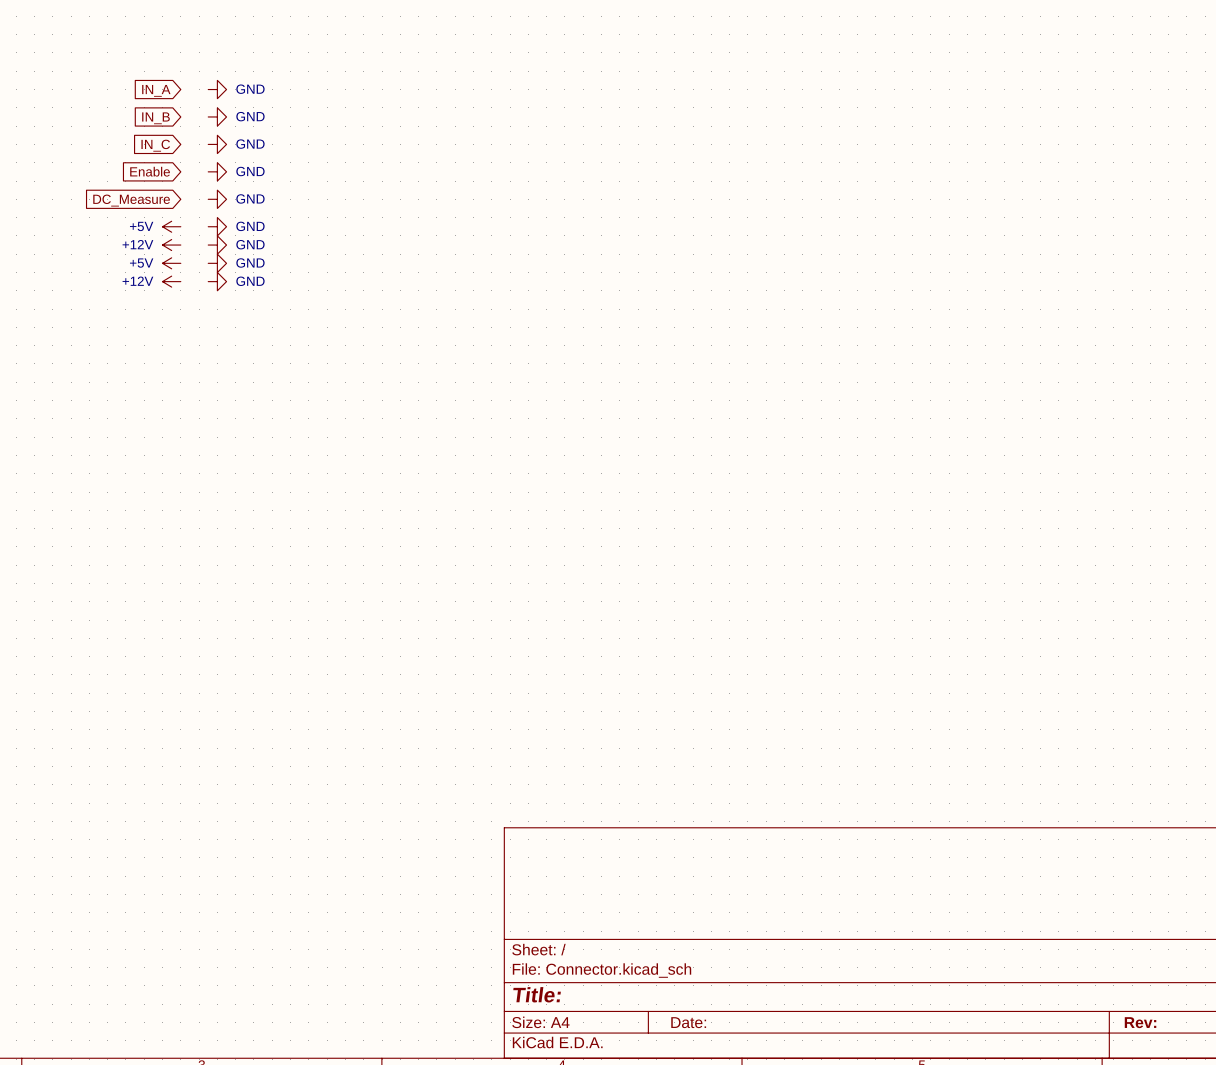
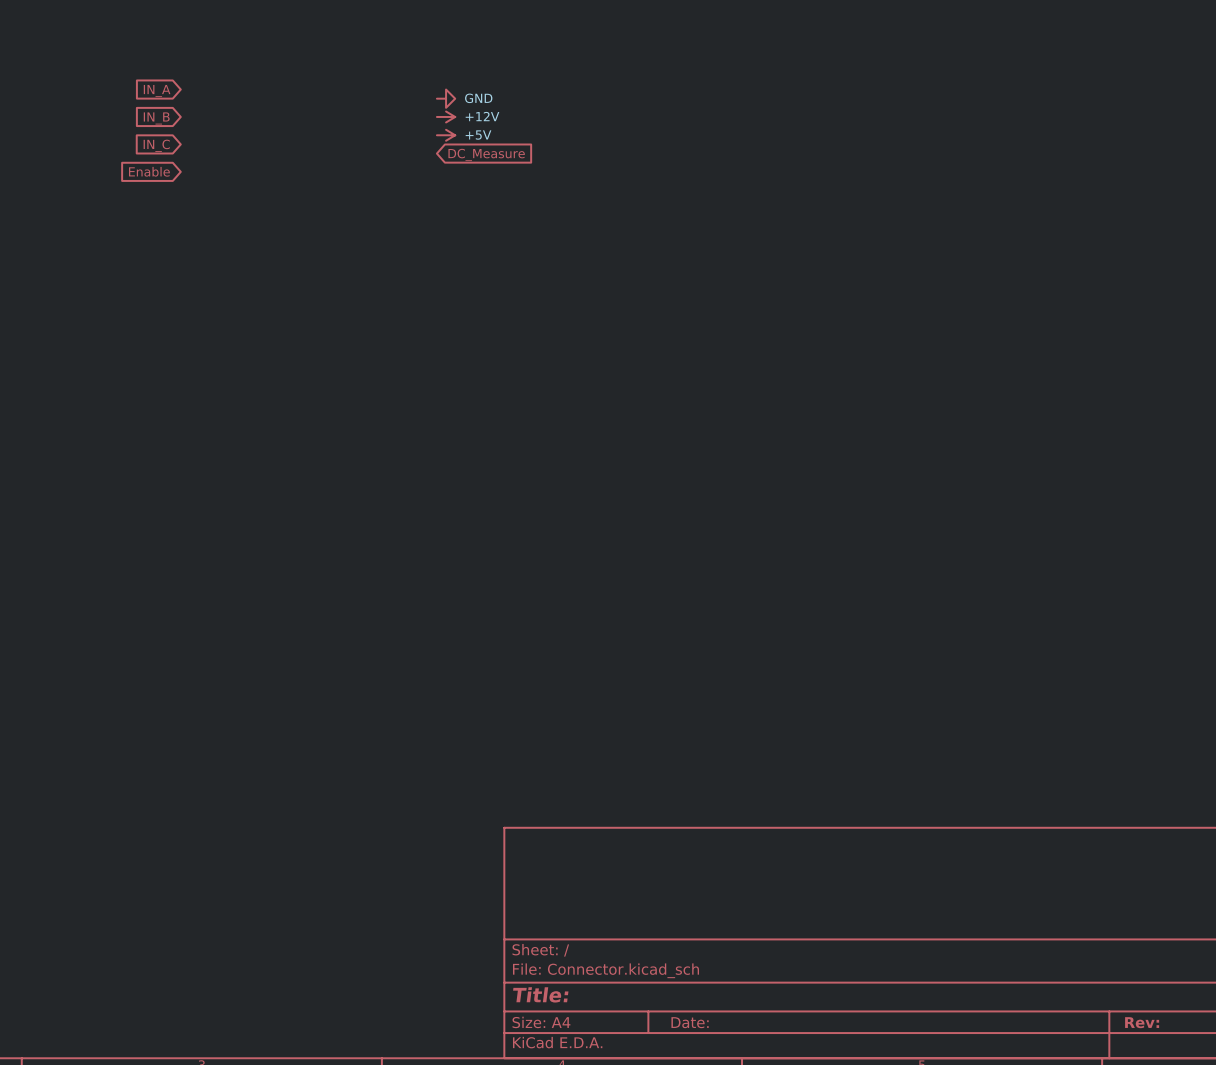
power symbol: GND (217, 89) -> none
power symbol: none -> GND (446, 98)
power symbol: GND (217, 116) -> none
power symbol: none -> +12V (446, 116)
power symbol: none -> +5V (446, 135)
power symbol: GND (217, 144) -> none
global label: none -> DC_Measure (486, 154)
power symbol: GND (217, 171) -> none
power symbol: GND (217, 199) -> none
global label: DC_Measure (131, 200) -> none
power symbol: +5V (171, 226) -> none
power symbol: GND (217, 226) -> none
power symbol: +12V (171, 245) -> none
power symbol: GND (217, 245) -> none
power symbol: +5V (171, 263) -> none
power symbol: GND (217, 263) -> none
power symbol: +12V (171, 281) -> none
power symbol: GND (217, 281) -> none

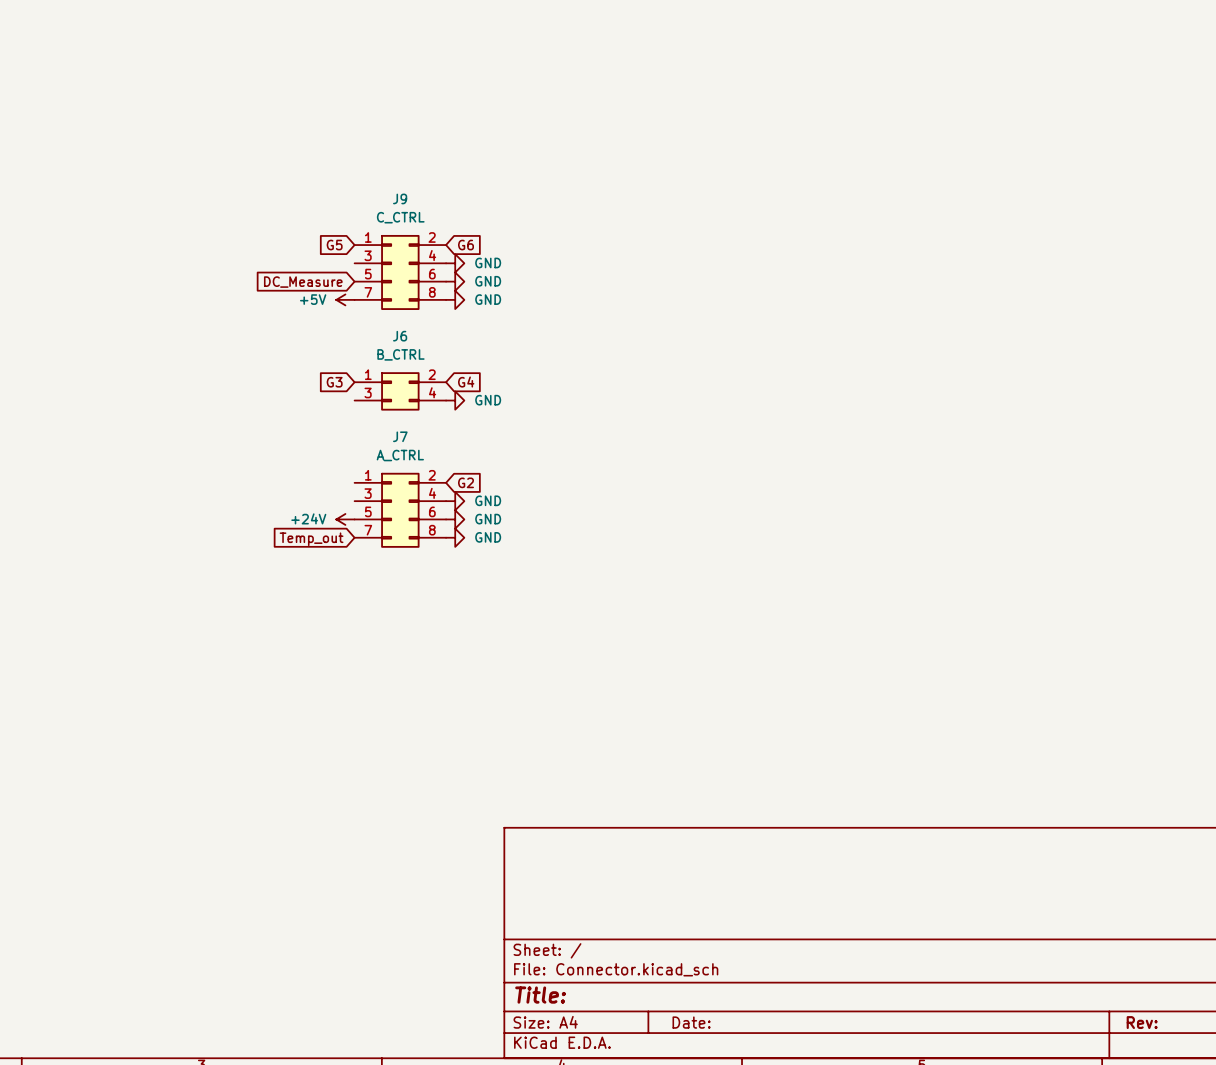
global label: IN_A (157, 91) -> none
power symbol: GND (446, 98) -> none
power symbol: +12V (446, 116) -> none
global label: IN_B (156, 118) -> none
power symbol: +5V (446, 135) -> none
global label: IN_C (156, 145) -> none
global label rotation: 0° (486, 154) -> 180° (303, 282)
global label position: DC_Measure (486, 154) -> DC_Measure (303, 282)
global label: Enable (149, 171) -> none
global label: none -> G5 (334, 245)
global label: none -> G6 (466, 245)
power symbol: none -> GND (455, 263)
J9: none -> C_CTRL (400, 272)
power symbol: none -> GND (455, 281)
power symbol: none -> +5V (345, 299)
power symbol: none -> GND (455, 299)
global label: none -> G3 (334, 382)
global label: none -> G4 (466, 382)
J6: none -> B_CTRL (400, 391)
power symbol: none -> GND (455, 400)
global label: none -> G2 (466, 482)
power symbol: none -> GND (455, 501)
J7: none -> A_CTRL (400, 510)
power symbol: none -> +24V (345, 519)
power symbol: none -> GND (455, 519)
power symbol: none -> GND (455, 537)
global label: none -> Temp_out (311, 539)

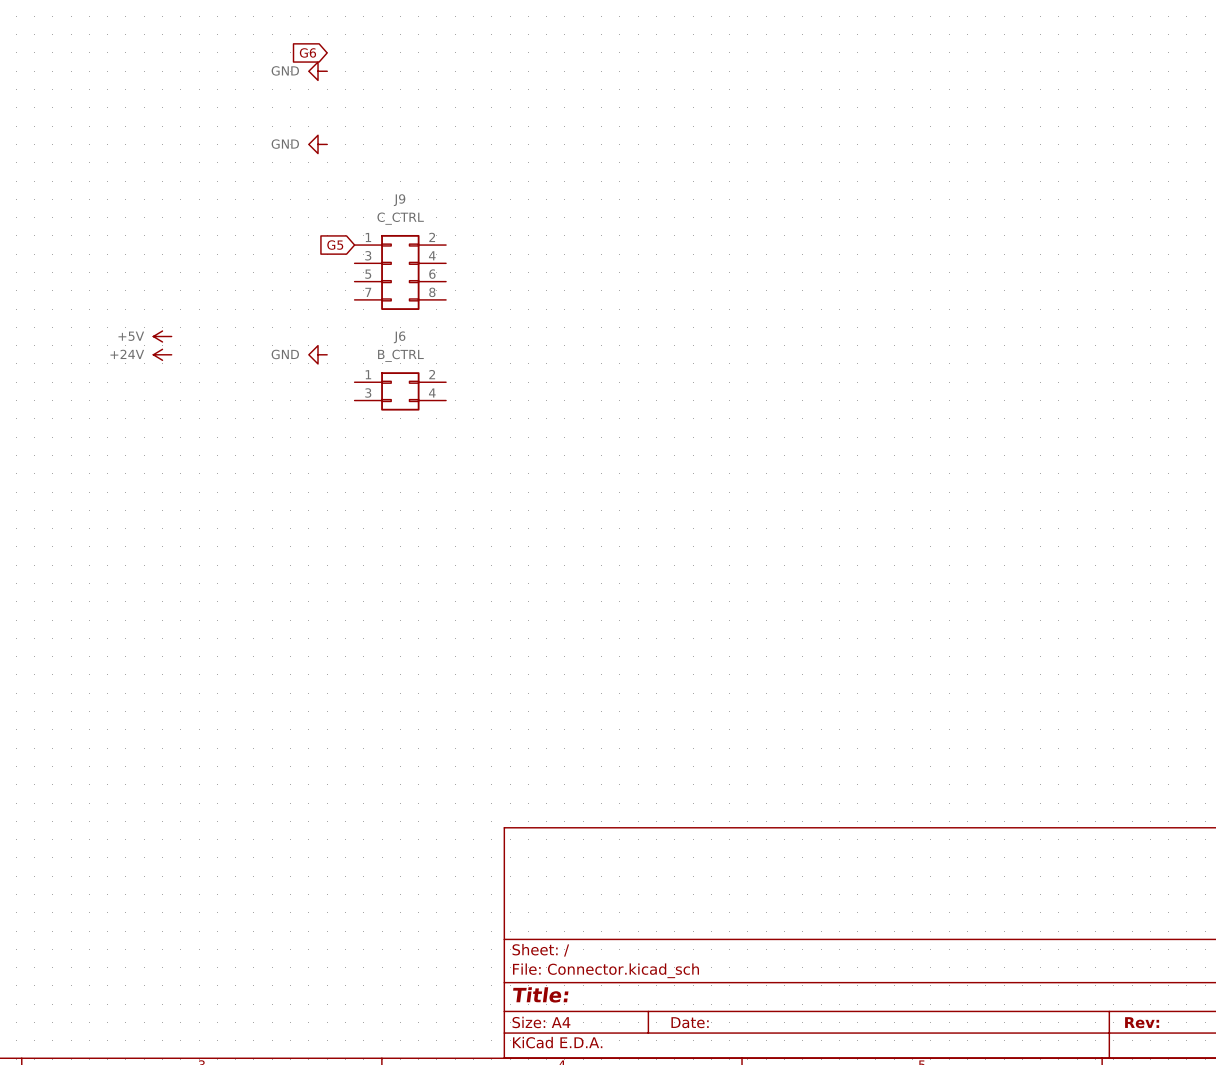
global label: none -> G6 (307, 52)
power symbol: none -> GND (318, 71)
power symbol: none -> GND (318, 144)
global label: G6 (466, 245) -> none
power symbol: GND (455, 263) -> none
power symbol: GND (455, 281) -> none
global label: DC_Measure (303, 282) -> none
power symbol: +5V (345, 299) -> none
power symbol: GND (455, 299) -> none
power symbol: none -> +5V (162, 336)
power symbol: none -> +24V (162, 354)
power symbol: none -> GND (318, 354)
global label: G3 (334, 382) -> none
global label: G4 (466, 382) -> none
power symbol: GND (455, 400) -> none
global label: G2 (466, 482) -> none
power symbol: GND (455, 501) -> none
J7: A_CTRL (400, 510) -> none
power symbol: +24V (345, 519) -> none
power symbol: GND (455, 519) -> none
power symbol: GND (455, 537) -> none
global label: Temp_out (311, 539) -> none

